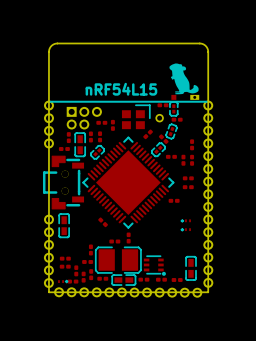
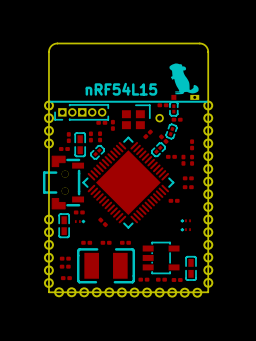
part footprint: [79, 106, 90, 117] -> [54, 104, 109, 121]
part: (71, 111) -> none
part: (96, 111) -> none
part: (71, 124) -> none
part: (84, 124) -> none
part: none -> (79, 212)
part: (128, 238) -> none
part: (114, 241) -> none
part: none -> (86, 242)
part: none -> (106, 242)
part: none -> (125, 242)
part: (90, 249) -> none
part footprint: [143, 255, 166, 276] -> [142, 242, 180, 274]
part: (118, 260) -> none
part: (87, 261) -> none
part: none -> (106, 265)
part: (76, 270) -> none
part: (91, 274) -> none
part: (83, 277) -> none
part: none -> (66, 278)
part: (102, 278) -> none
part: (123, 280) -> none
part position: (63, 281) -> (79, 221)
part: (72, 281) -> none

